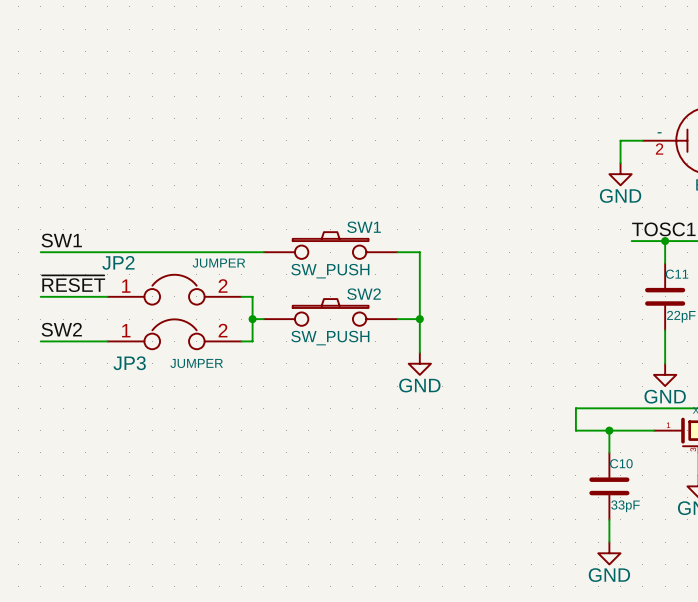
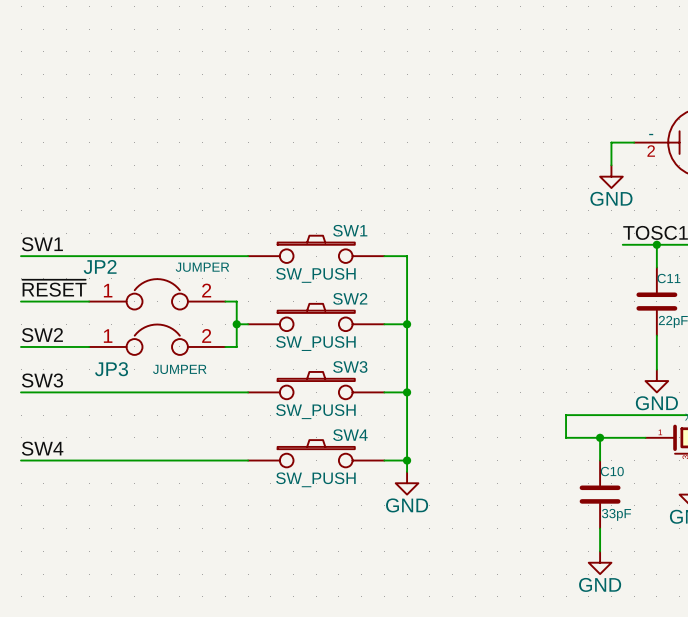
wire: none -> (407, 358) (407, 471)
power symbol position: GND (419, 363) -> GND (407, 483)
label: none -> SW3 (42, 380)
SW3: none -> SW_PUSH (316, 385)
wire: none -> (21, 392) (248, 392)
wire: none -> (384, 392) (407, 392)
junction: none -> (407, 392)
label: none -> SW4 (42, 448)
SW4: none -> SW_PUSH (316, 453)
wire: none -> (21, 460) (248, 460)
wire: none -> (384, 460) (407, 460)
junction: none -> (407, 460)

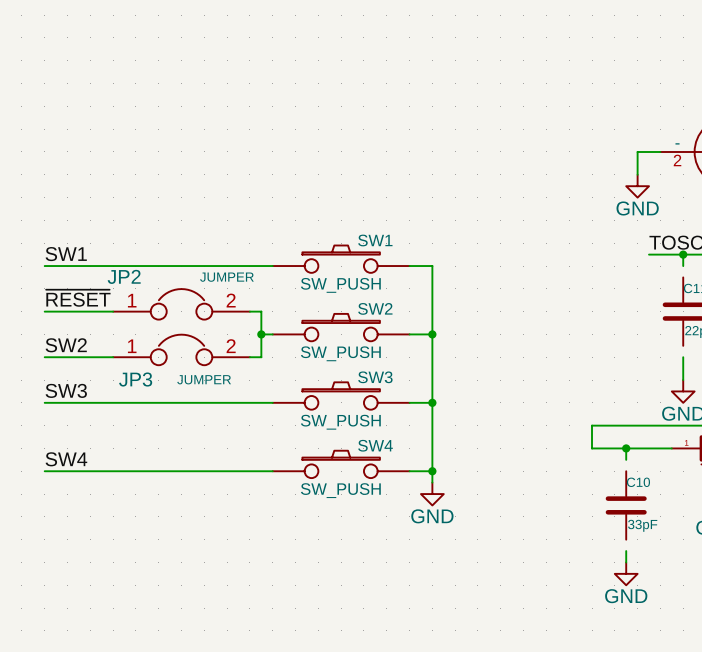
wire: (656, 256) (656, 267) -> none
wire: (656, 335) (656, 346) -> none
wire: (600, 449) (600, 460) -> none
wire: (600, 528) (600, 540) -> none

